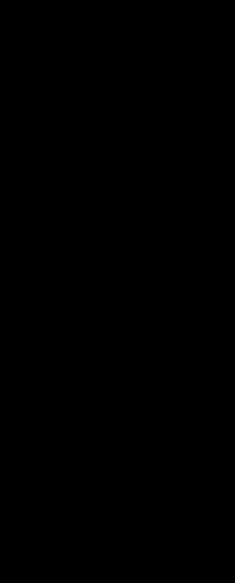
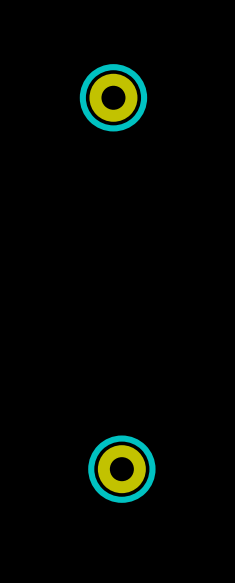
part: none -> (113, 97)
part: none -> (121, 469)

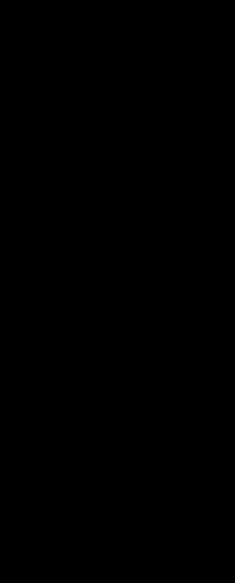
part: (113, 97) -> none
part: (121, 469) -> none

